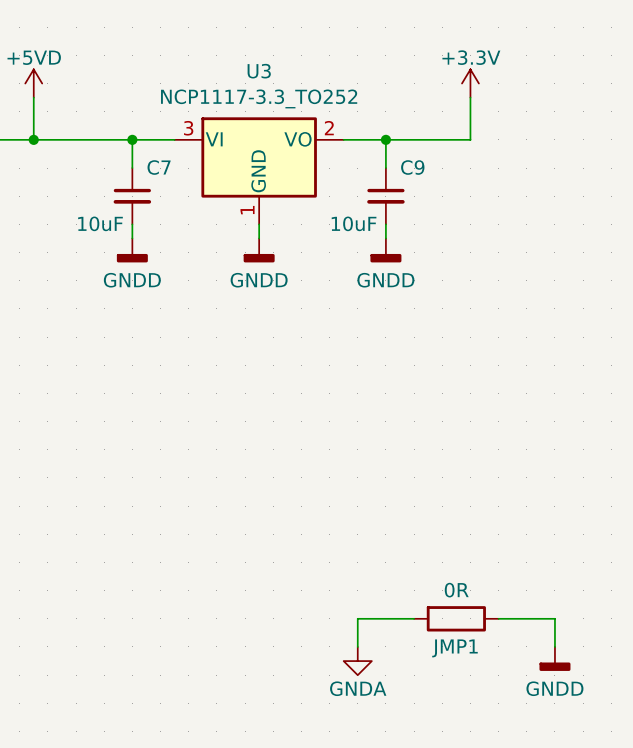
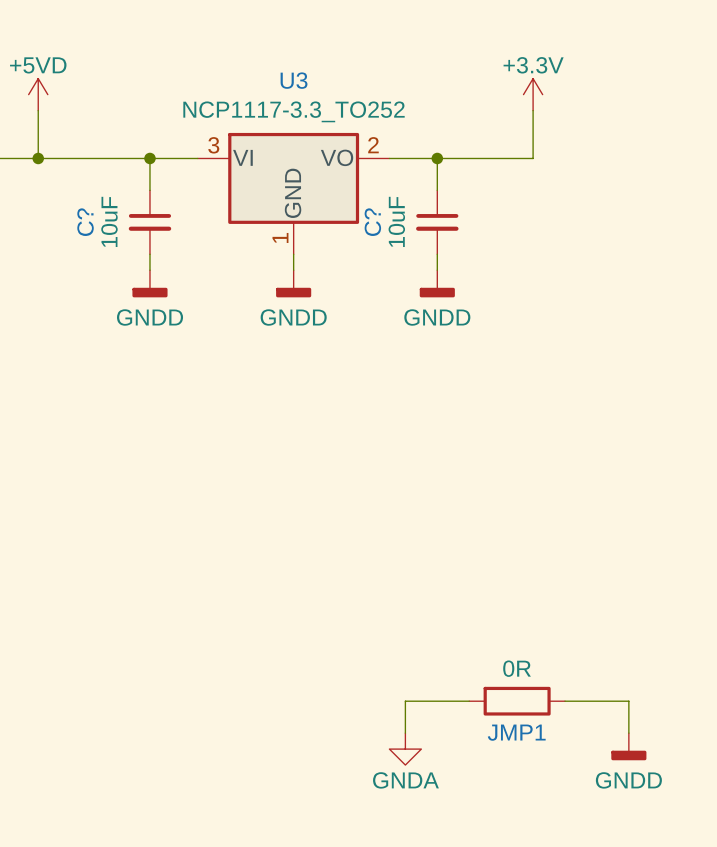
C7 name: C7 (159, 167) -> C? (85, 222)
C9 name: C9 (412, 167) -> C? (372, 222)
C7 value rotation: 0° (100, 223) -> 90° counterclockwise (109, 221)
C9 value rotation: 0° (354, 223) -> 90° counterclockwise (396, 221)

